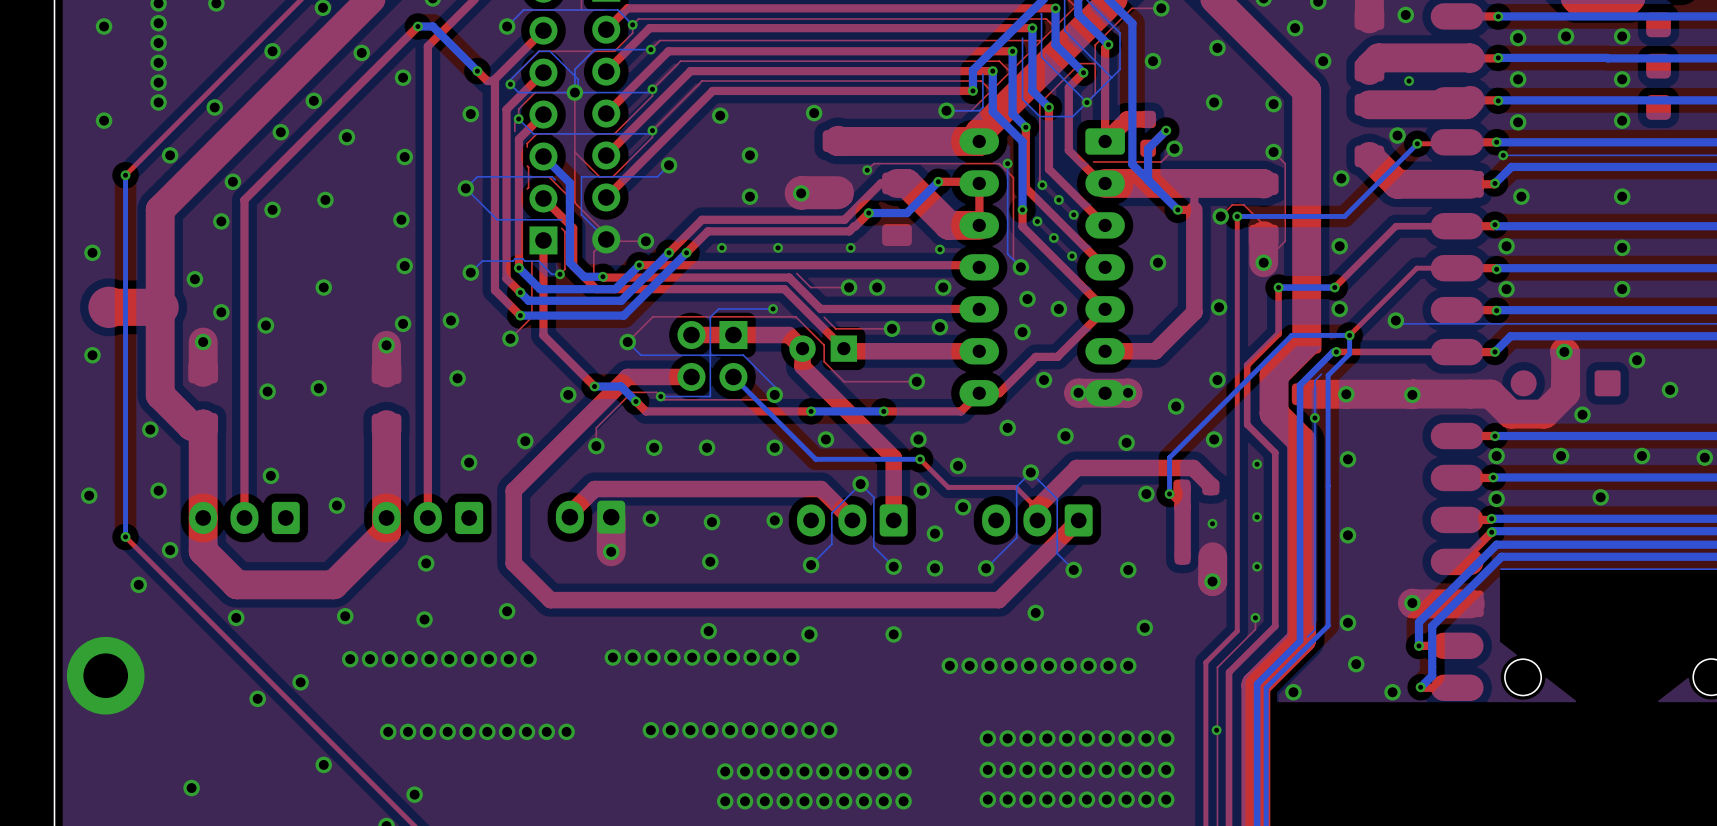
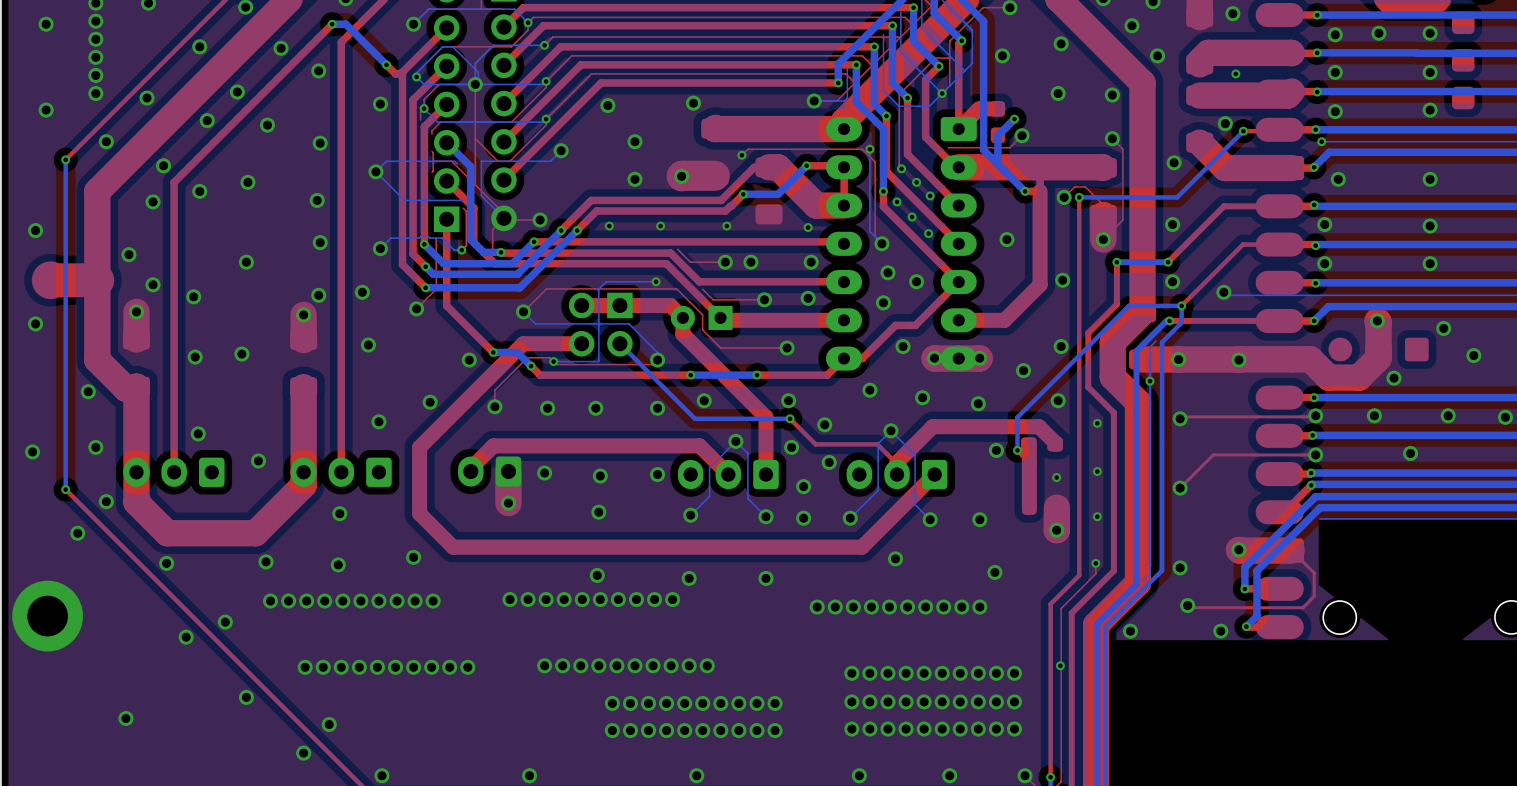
top track: none -> (1315, 415) (1182, 416) (1180, 418)
top track: none -> (1315, 454) (1213, 454) (1180, 488)
top track: none -> (1291, 550) (1314, 573) (1314, 596) (1302, 607) (1189, 607) (1187, 605)

